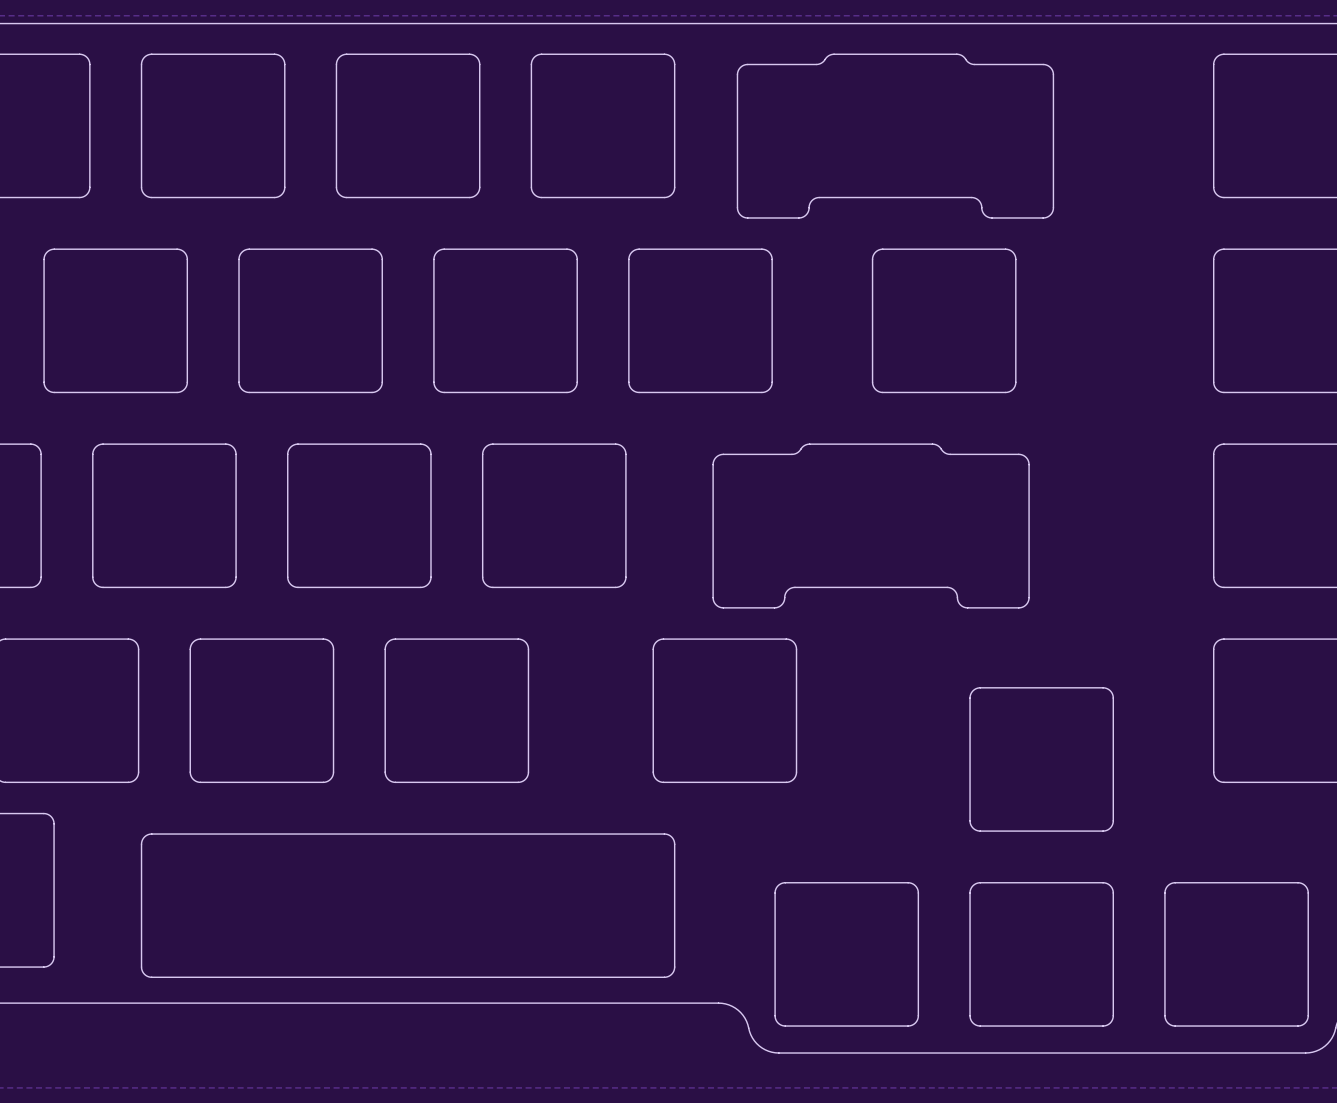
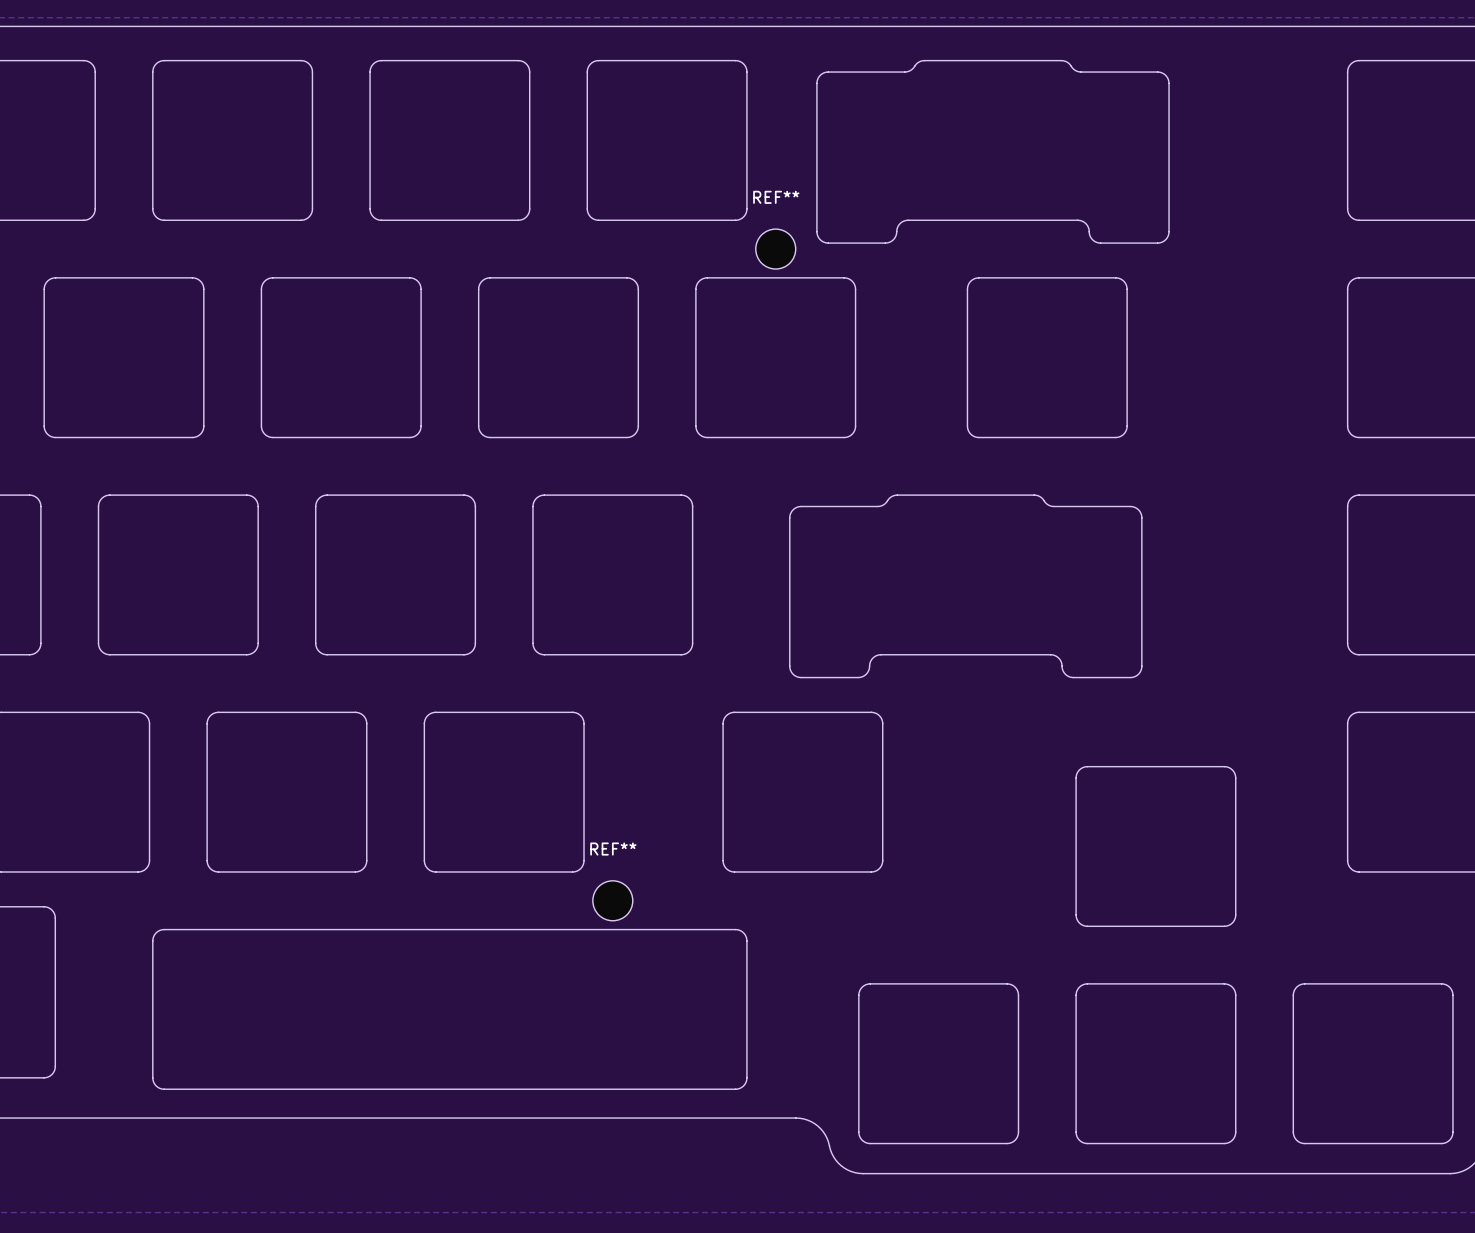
REF**: none -> (775, 249)
REF**: none -> (612, 900)

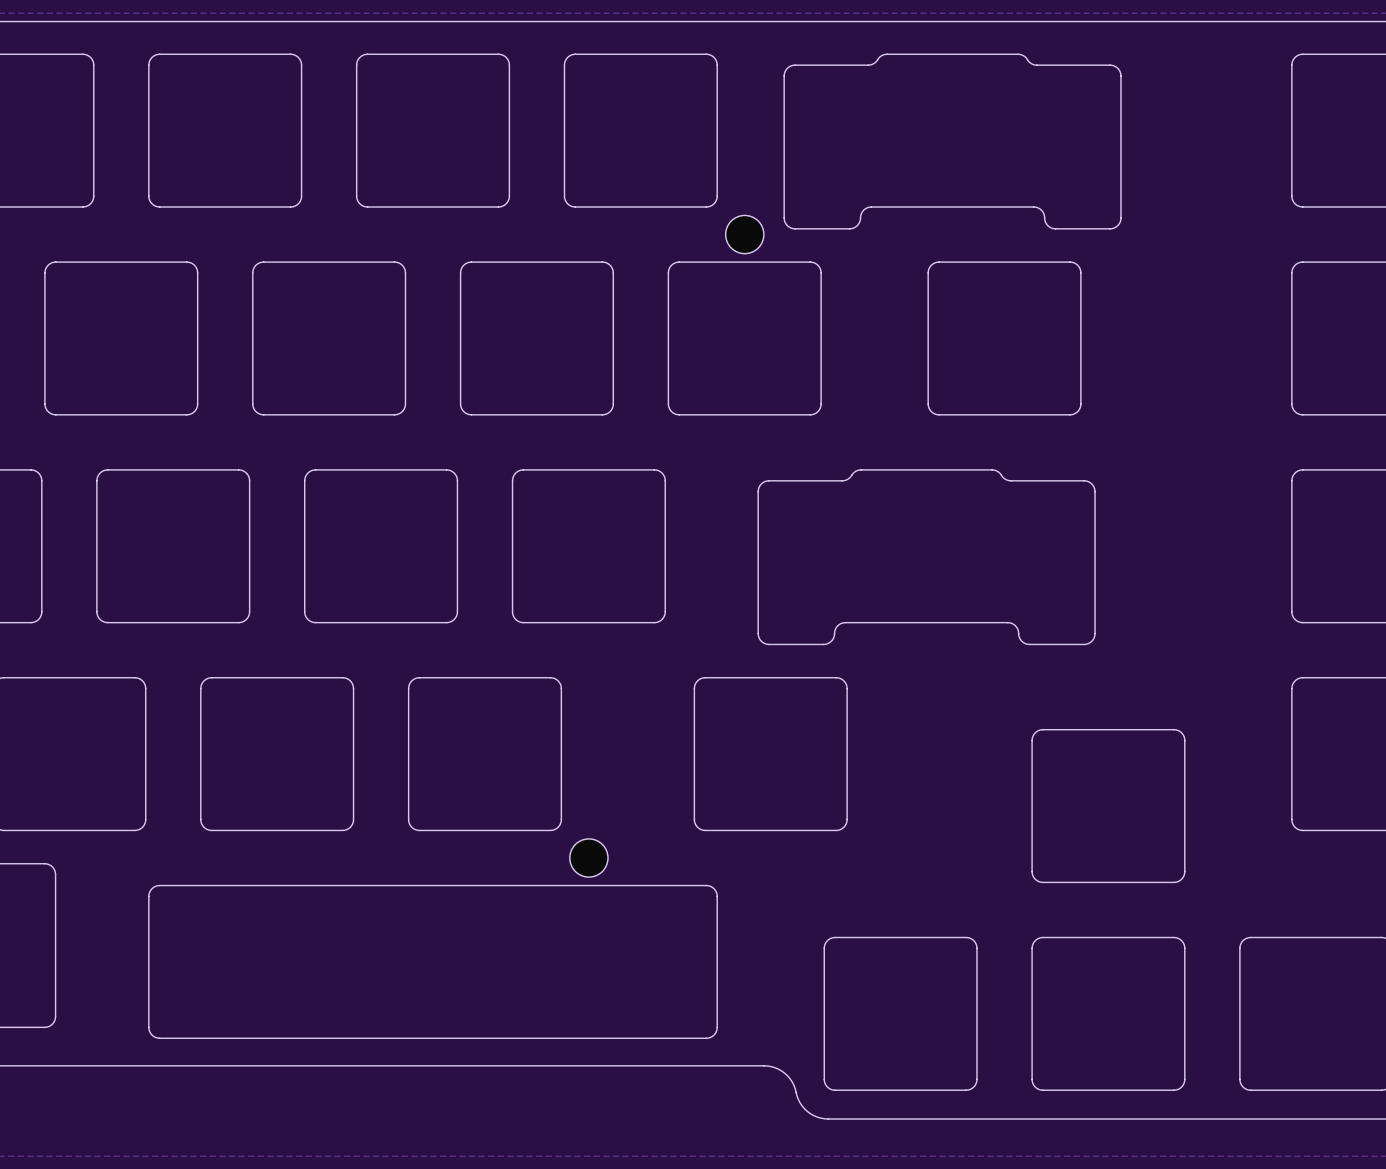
REF** name: REF** (776, 197) -> none
REF** name: REF** (613, 849) -> none

